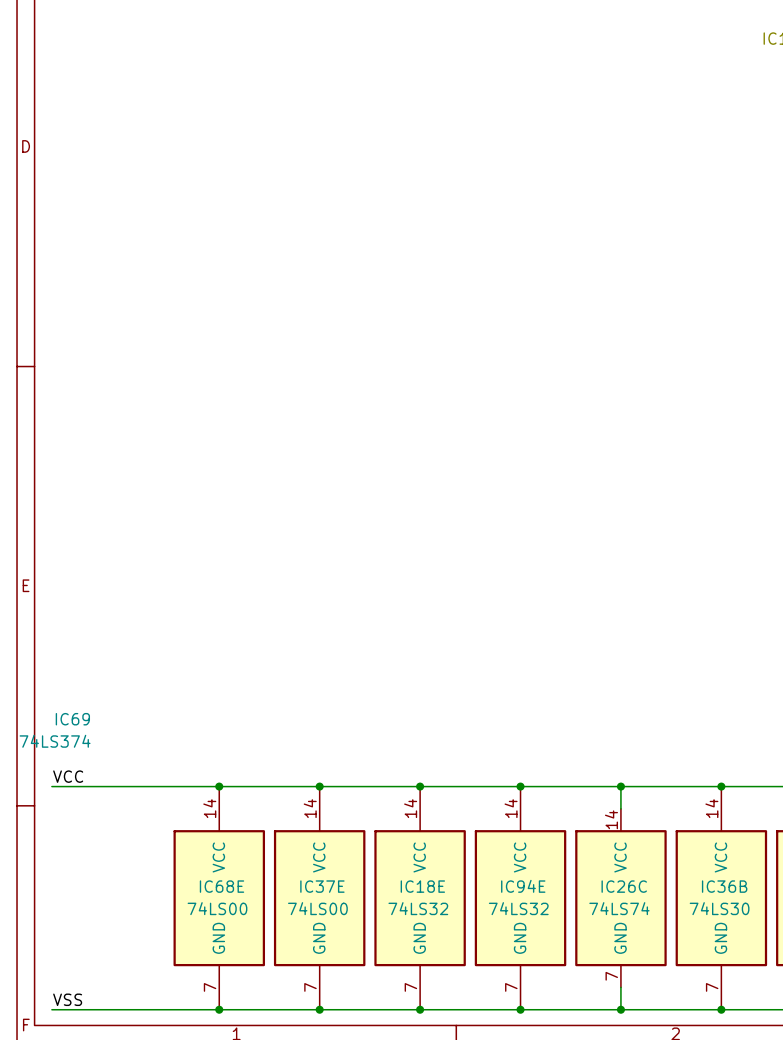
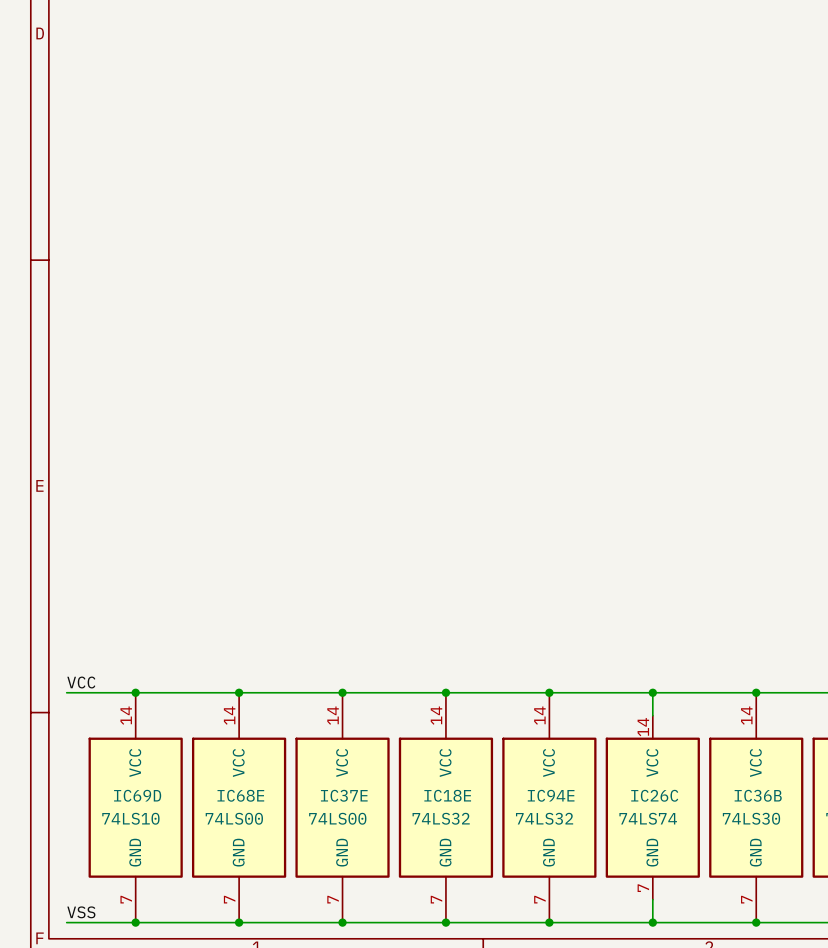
IC69: 74LS374 (55, 730) -> none
junction: none -> (135, 692)
IC69D: none -> 74LS10 (135, 807)
junction: none -> (135, 922)

